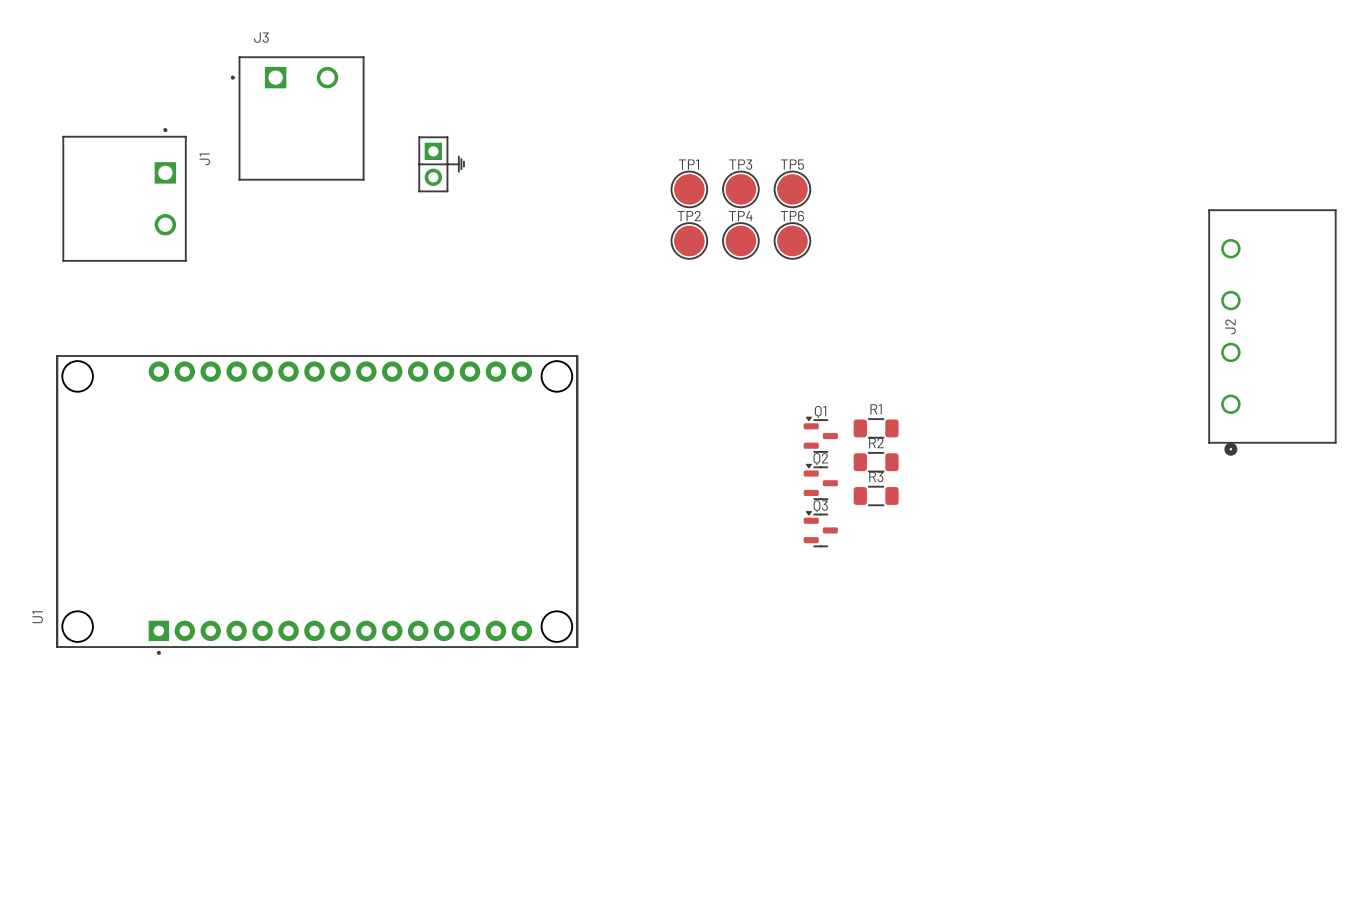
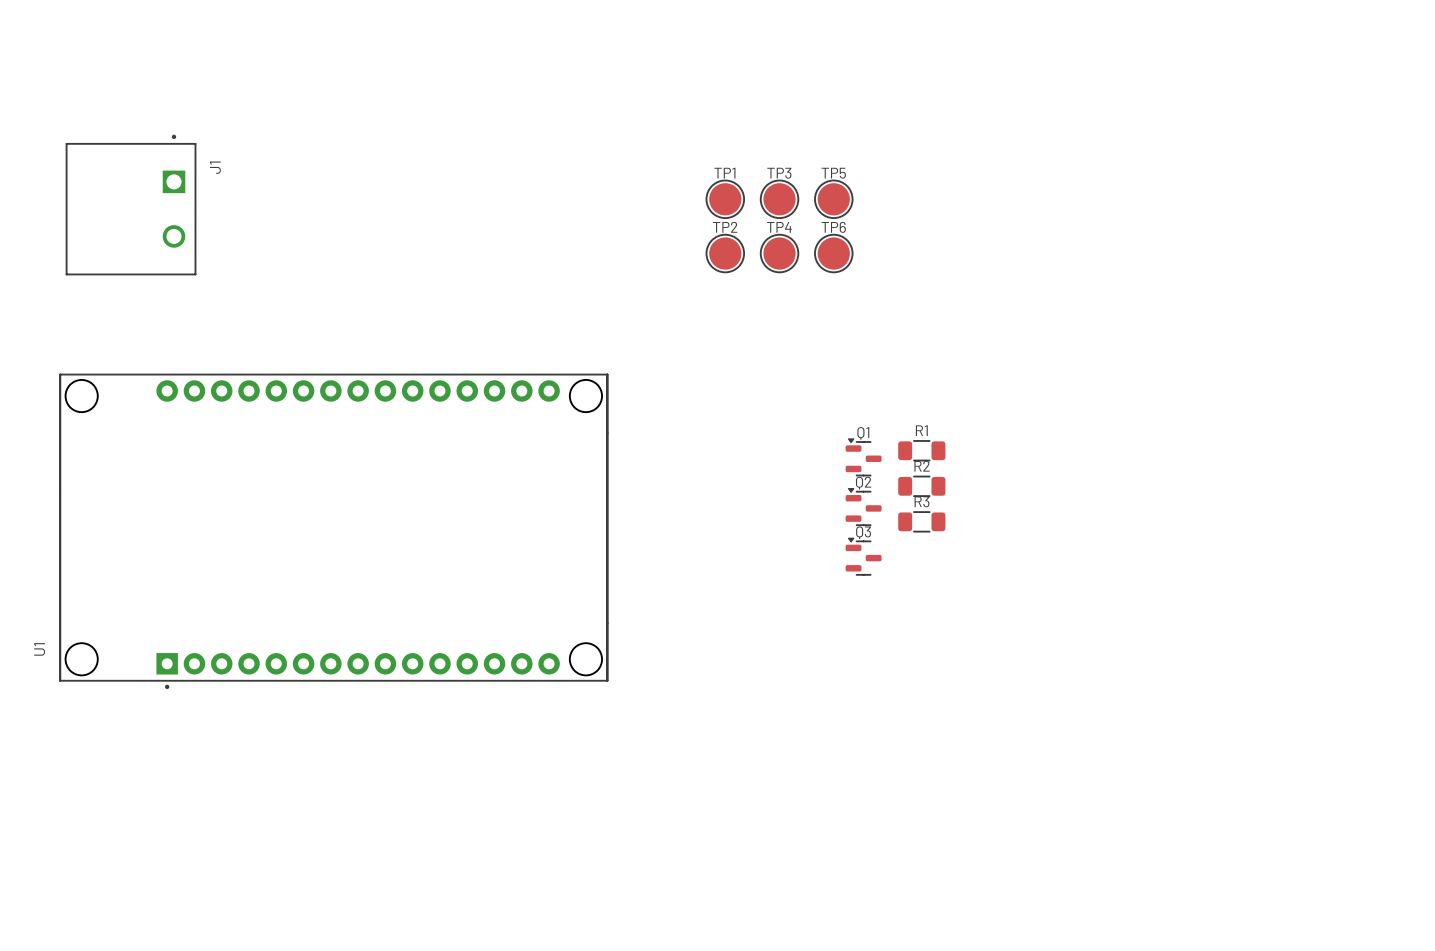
J3: (297, 118) -> none
part: (441, 164) -> none
J2: (1272, 332) -> none

